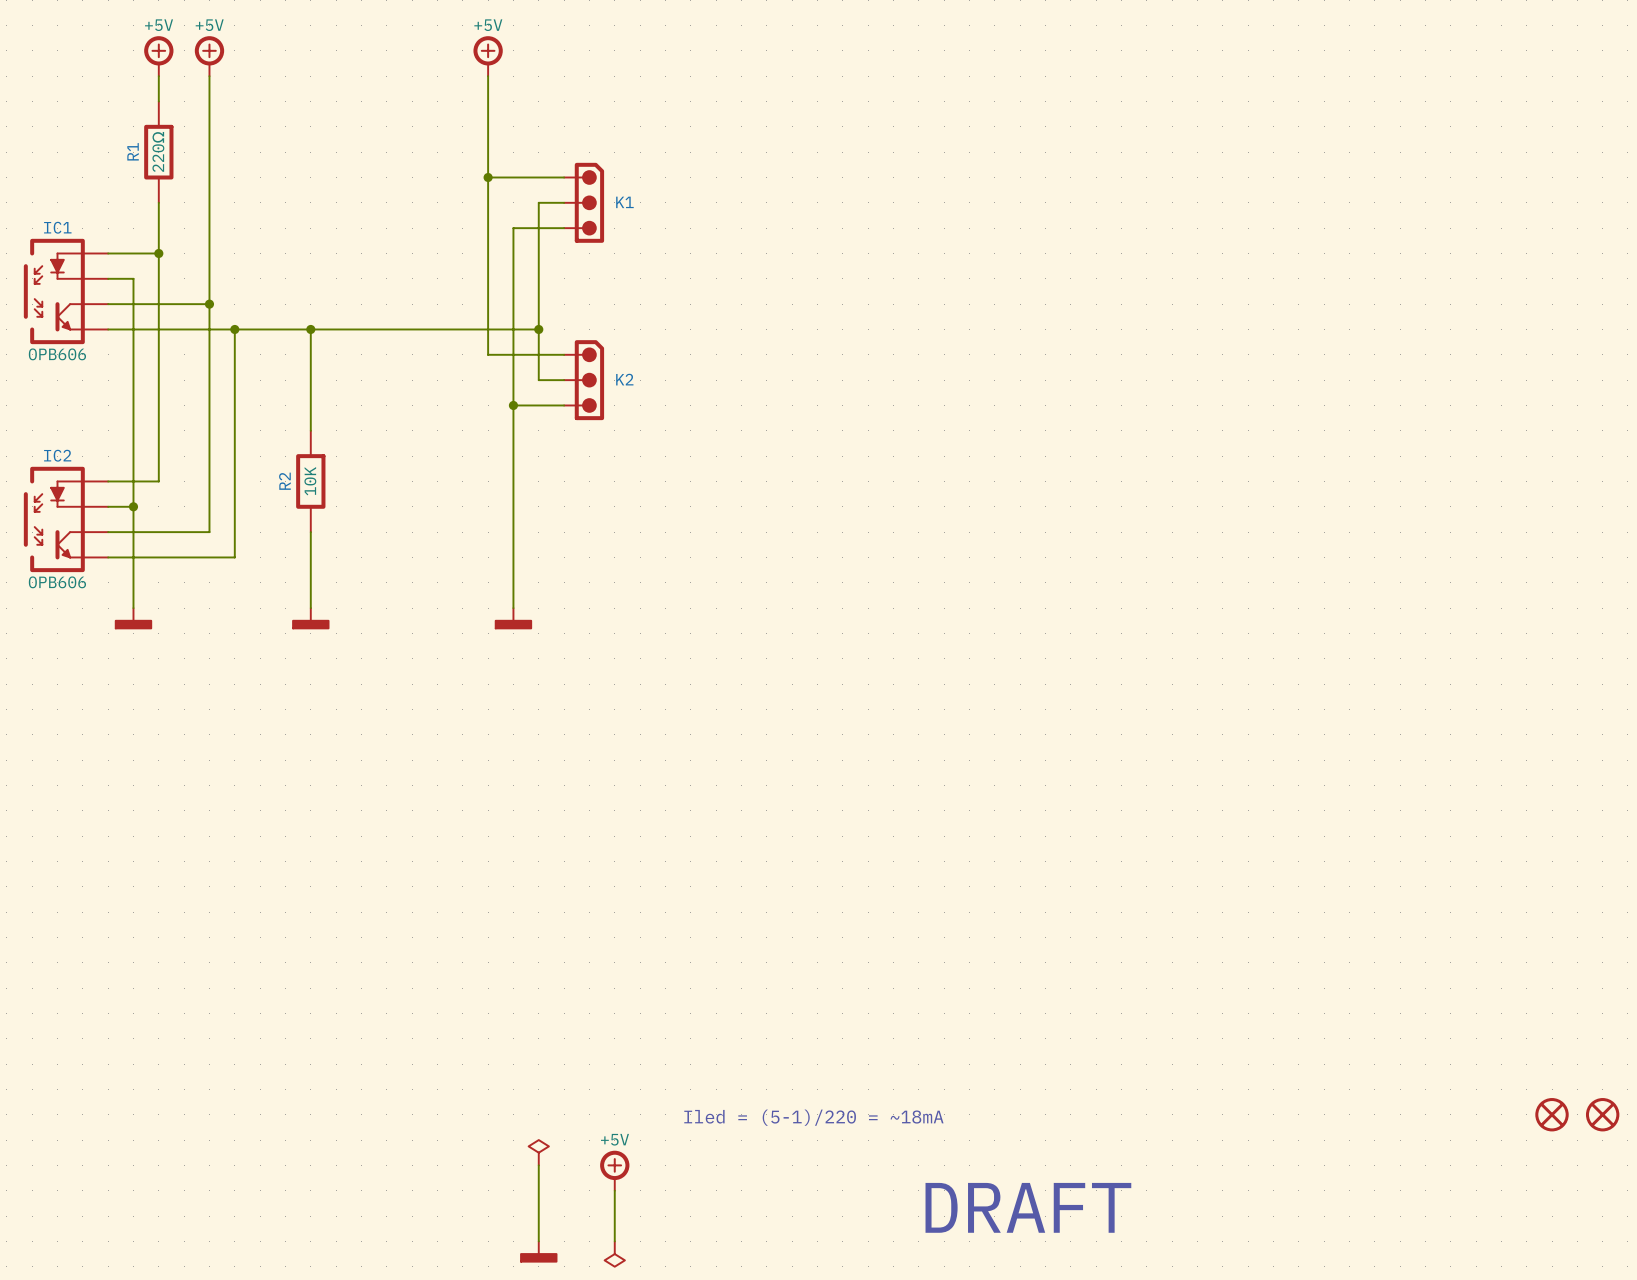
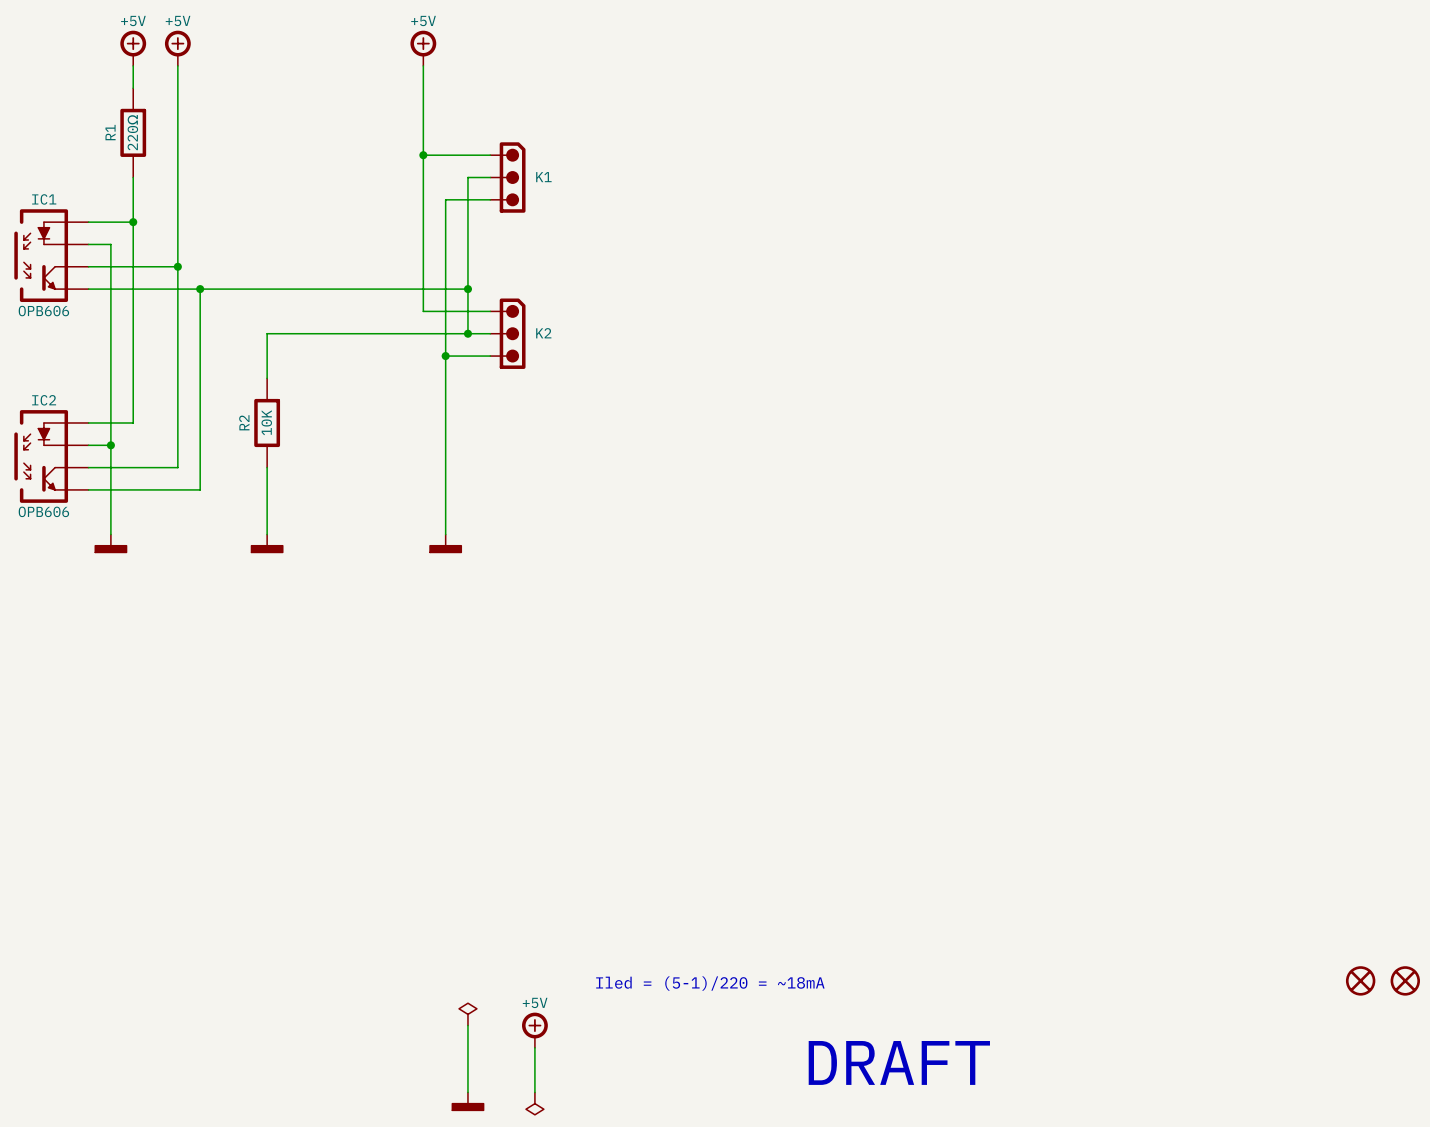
wire: (310, 329) (310, 380) -> (467, 333) (267, 333)
junction: (310, 329) -> none
junction: none -> (467, 333)

